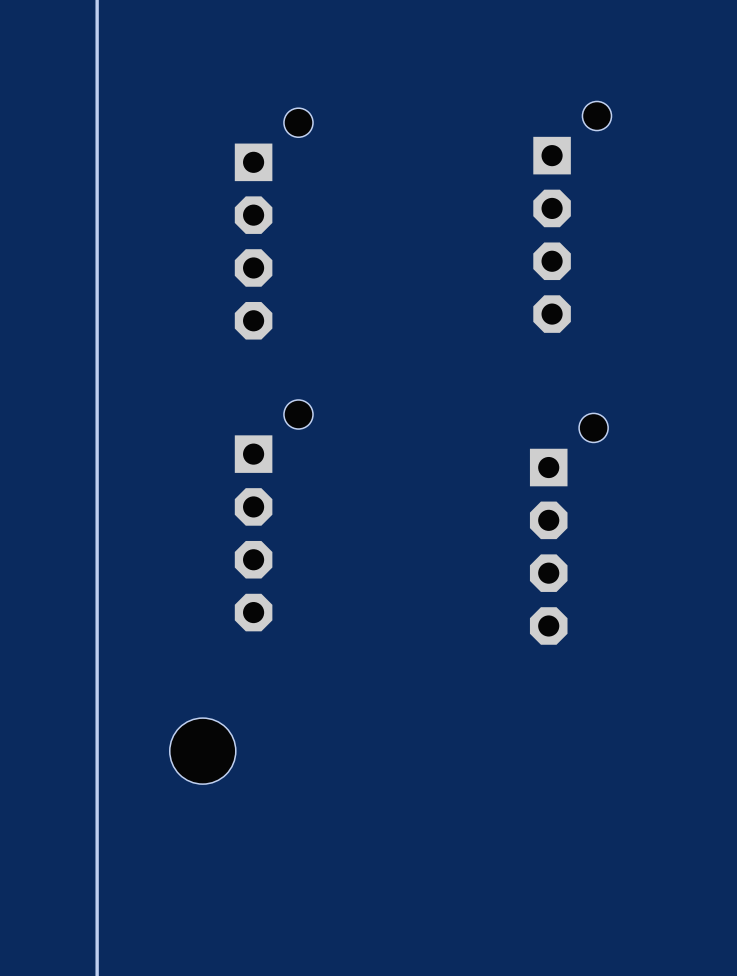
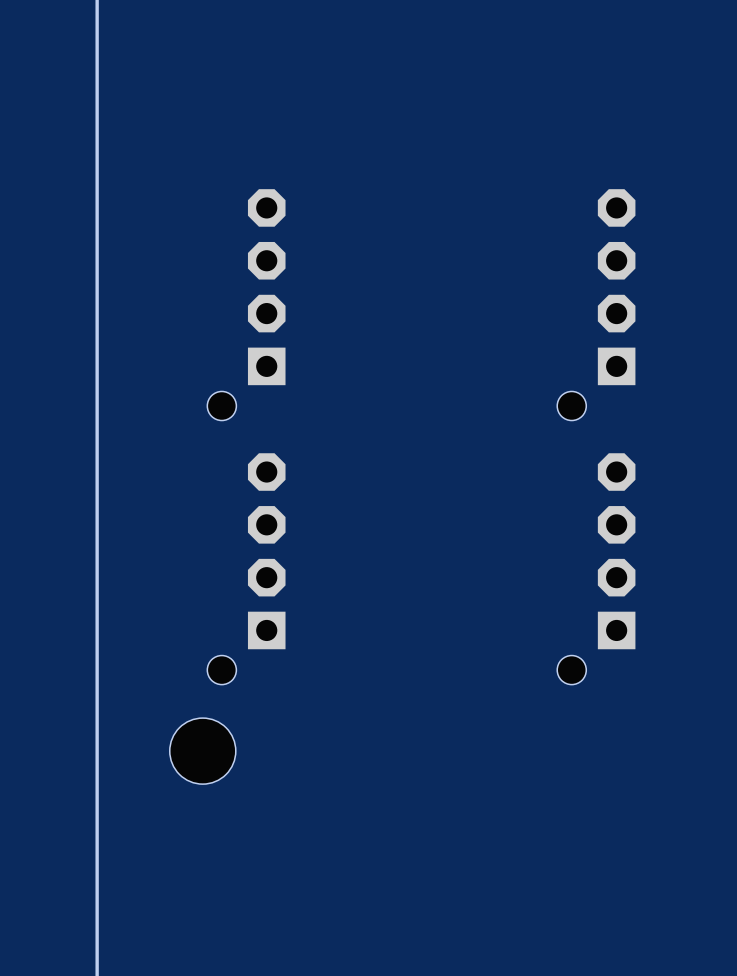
part rotation: 0° (572, 217) -> 180° (596, 304)
part rotation: 0° (273, 223) -> 180° (246, 304)
part rotation: 0° (273, 515) -> 180° (246, 568)
part rotation: 0° (569, 529) -> 180° (596, 568)

